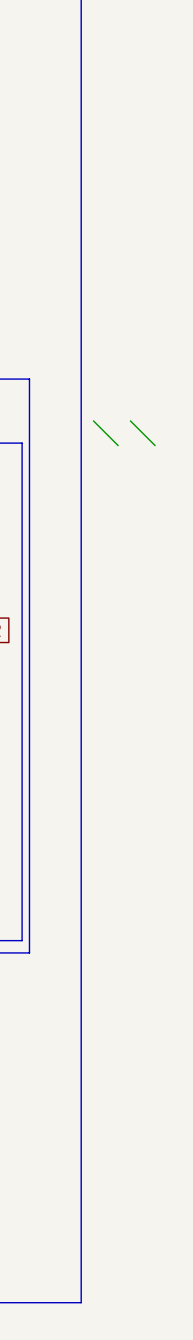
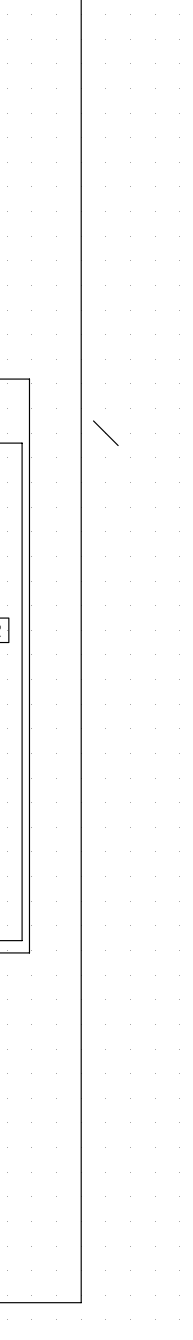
wire: (130, 420) (155, 445) -> none

